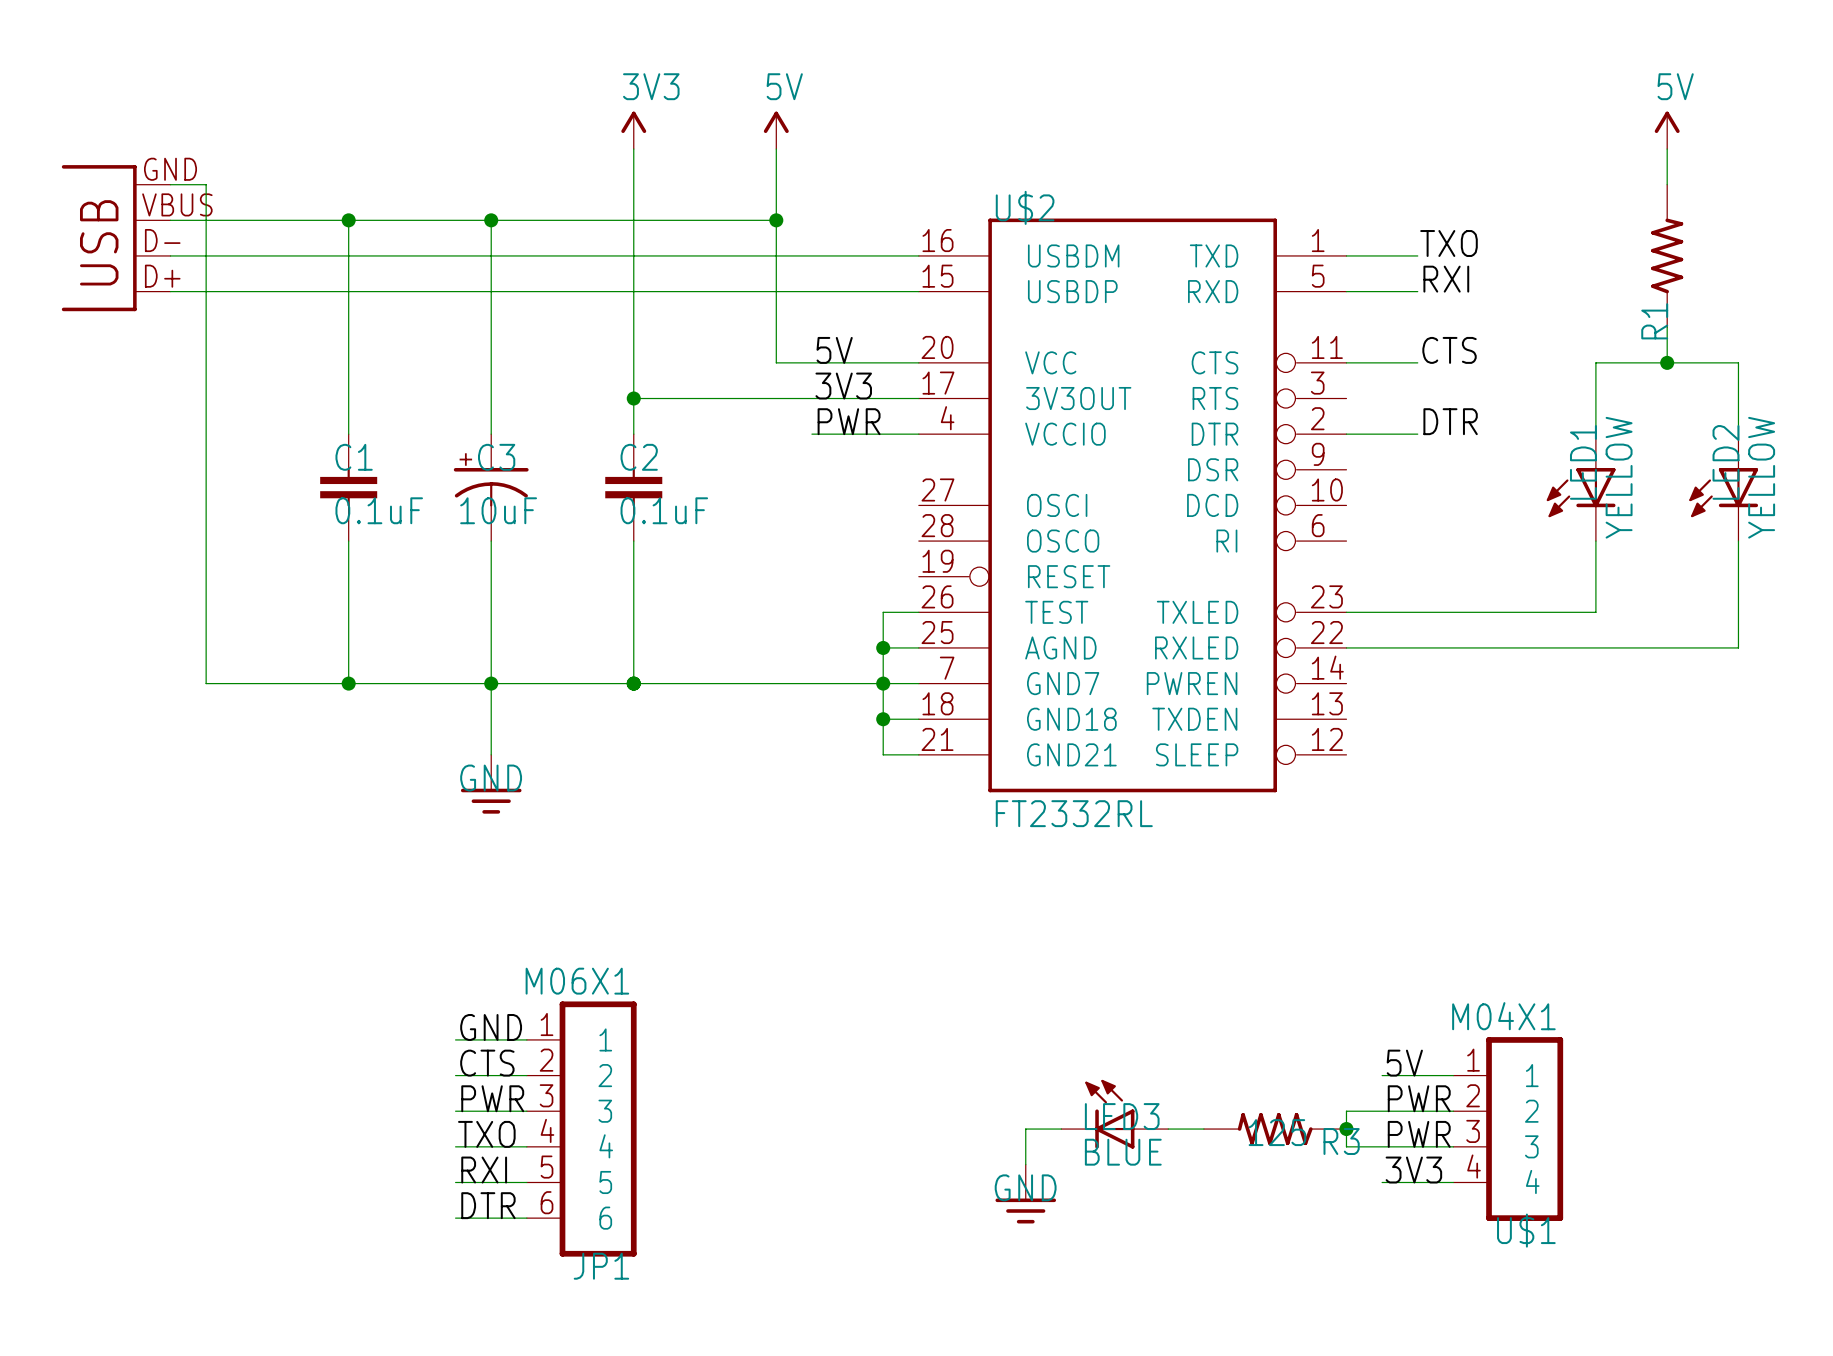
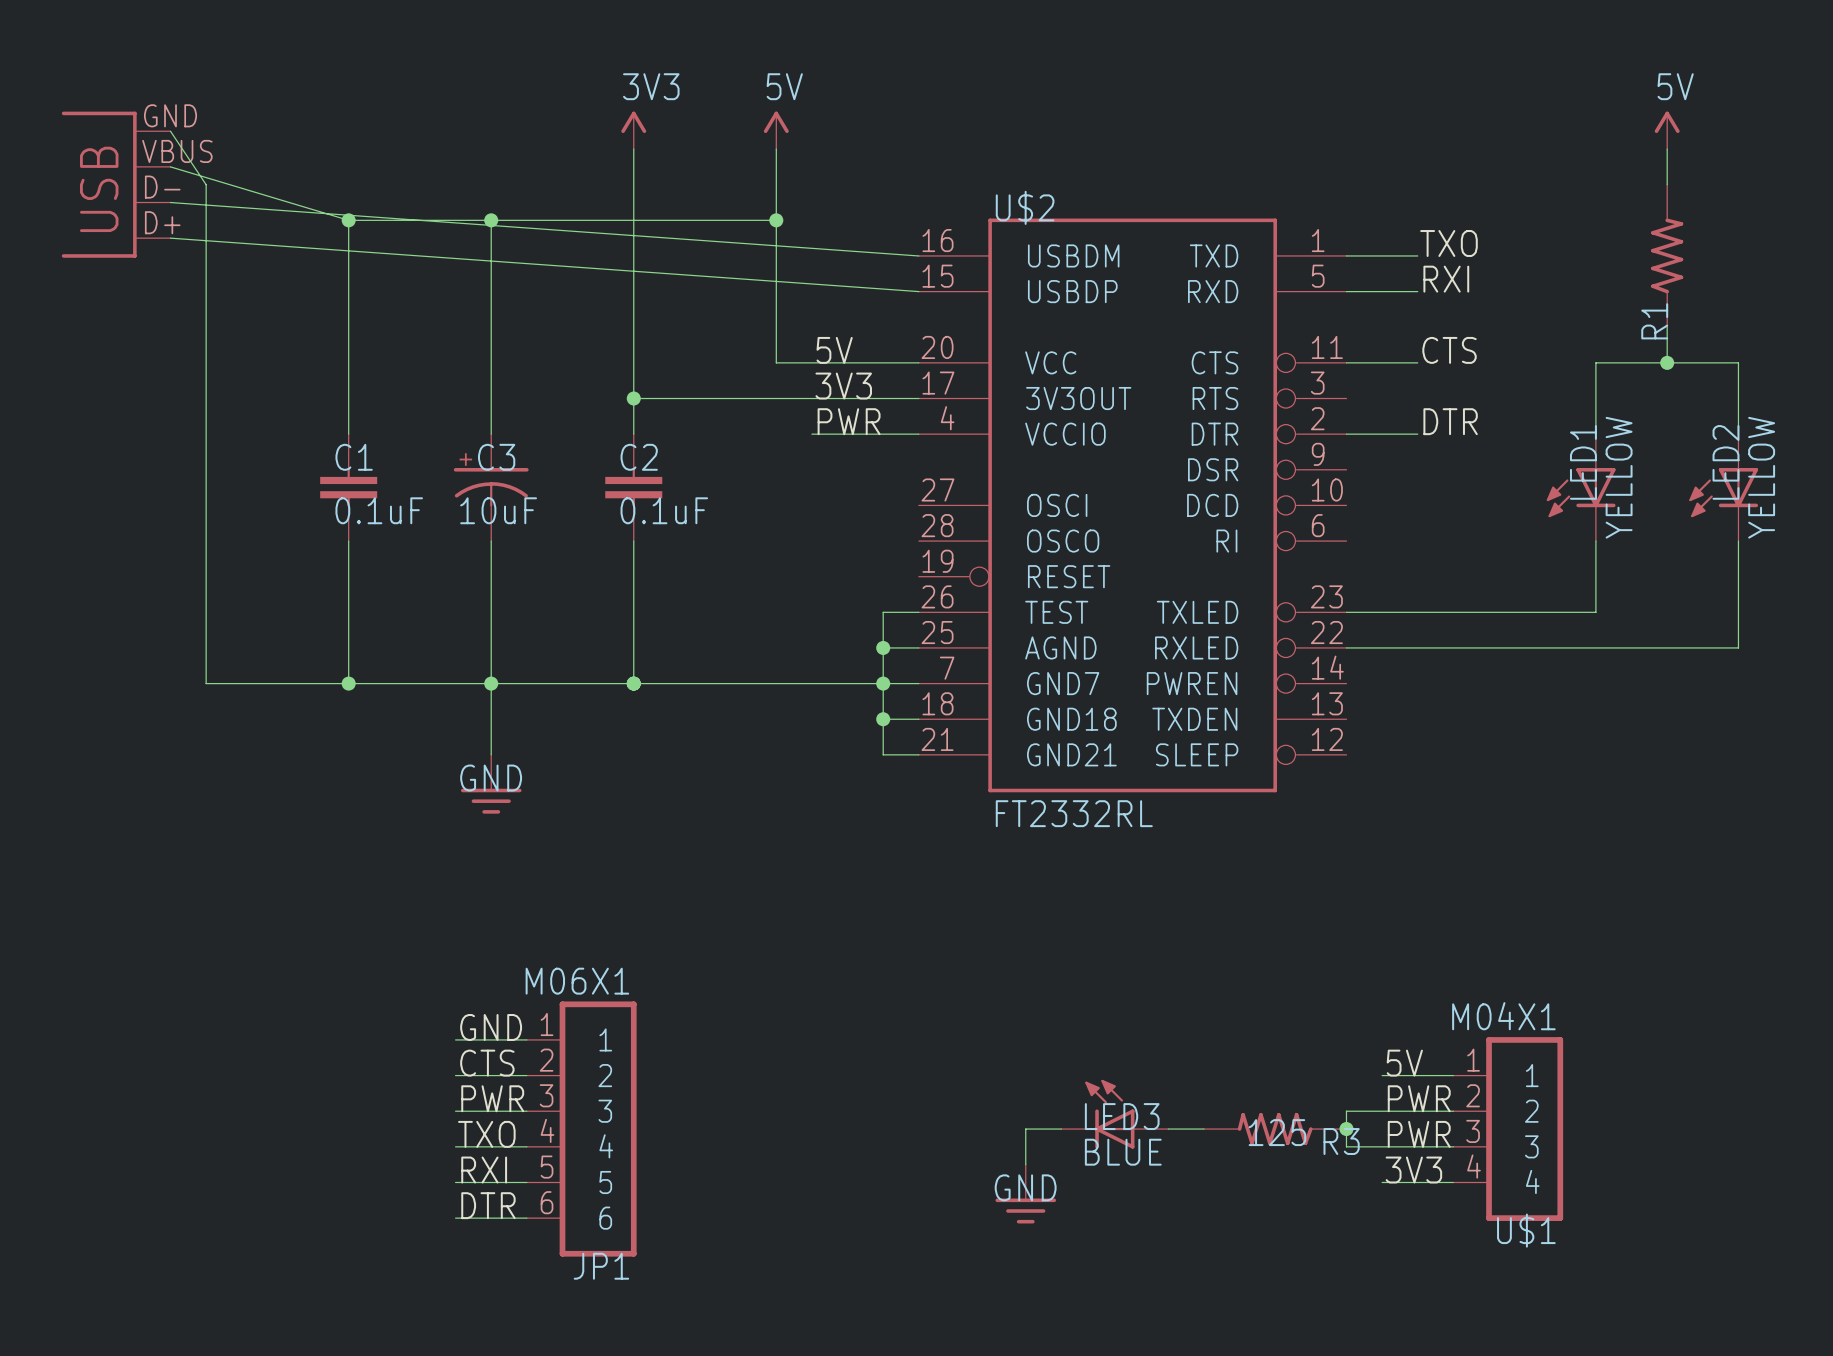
wire: (170, 184) (206, 184) -> (170, 131) (206, 184)
wire: (170, 220) (348, 220) -> (170, 166) (348, 220)
part position: (116, 238) -> (116, 184)
wire: (170, 255) (918, 255) -> (170, 202) (918, 255)
wire: (170, 291) (918, 291) -> (170, 238) (918, 291)

